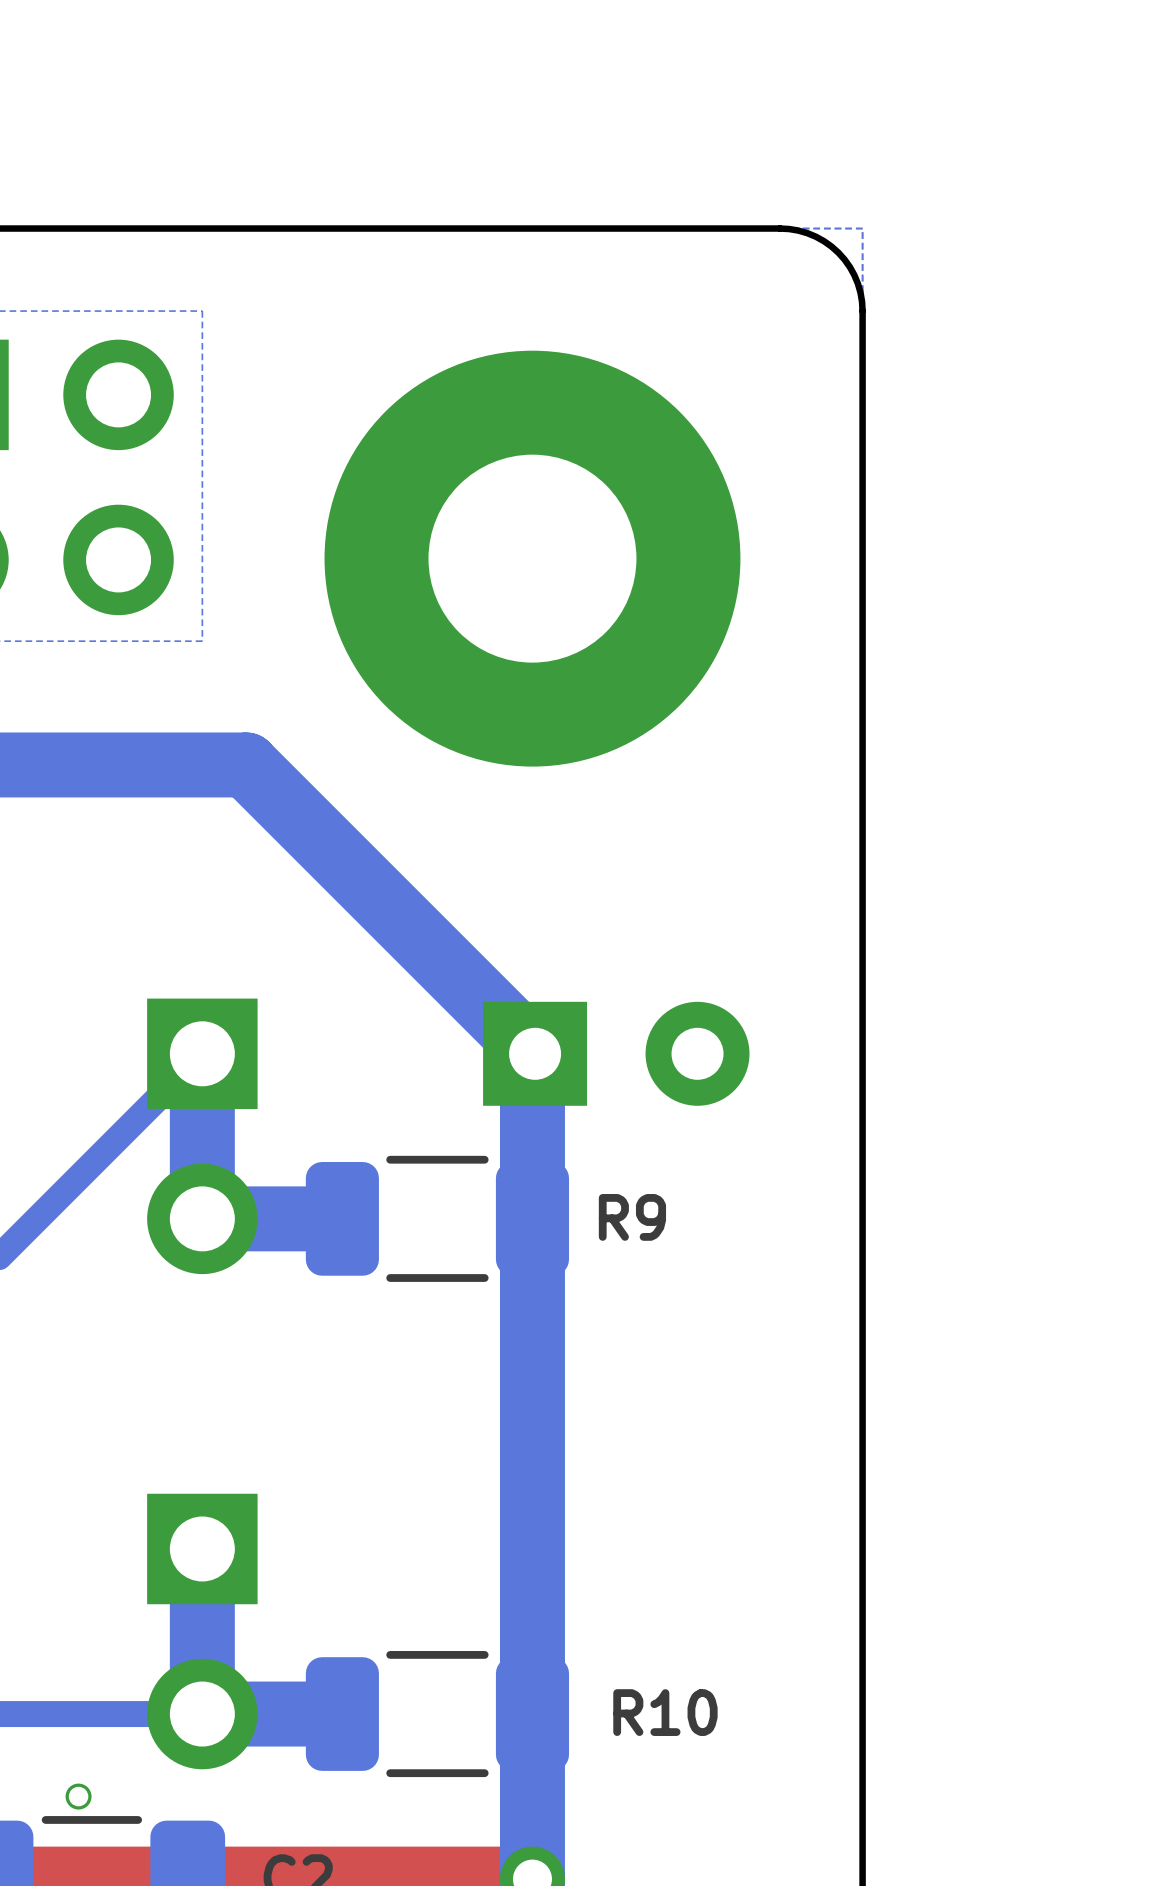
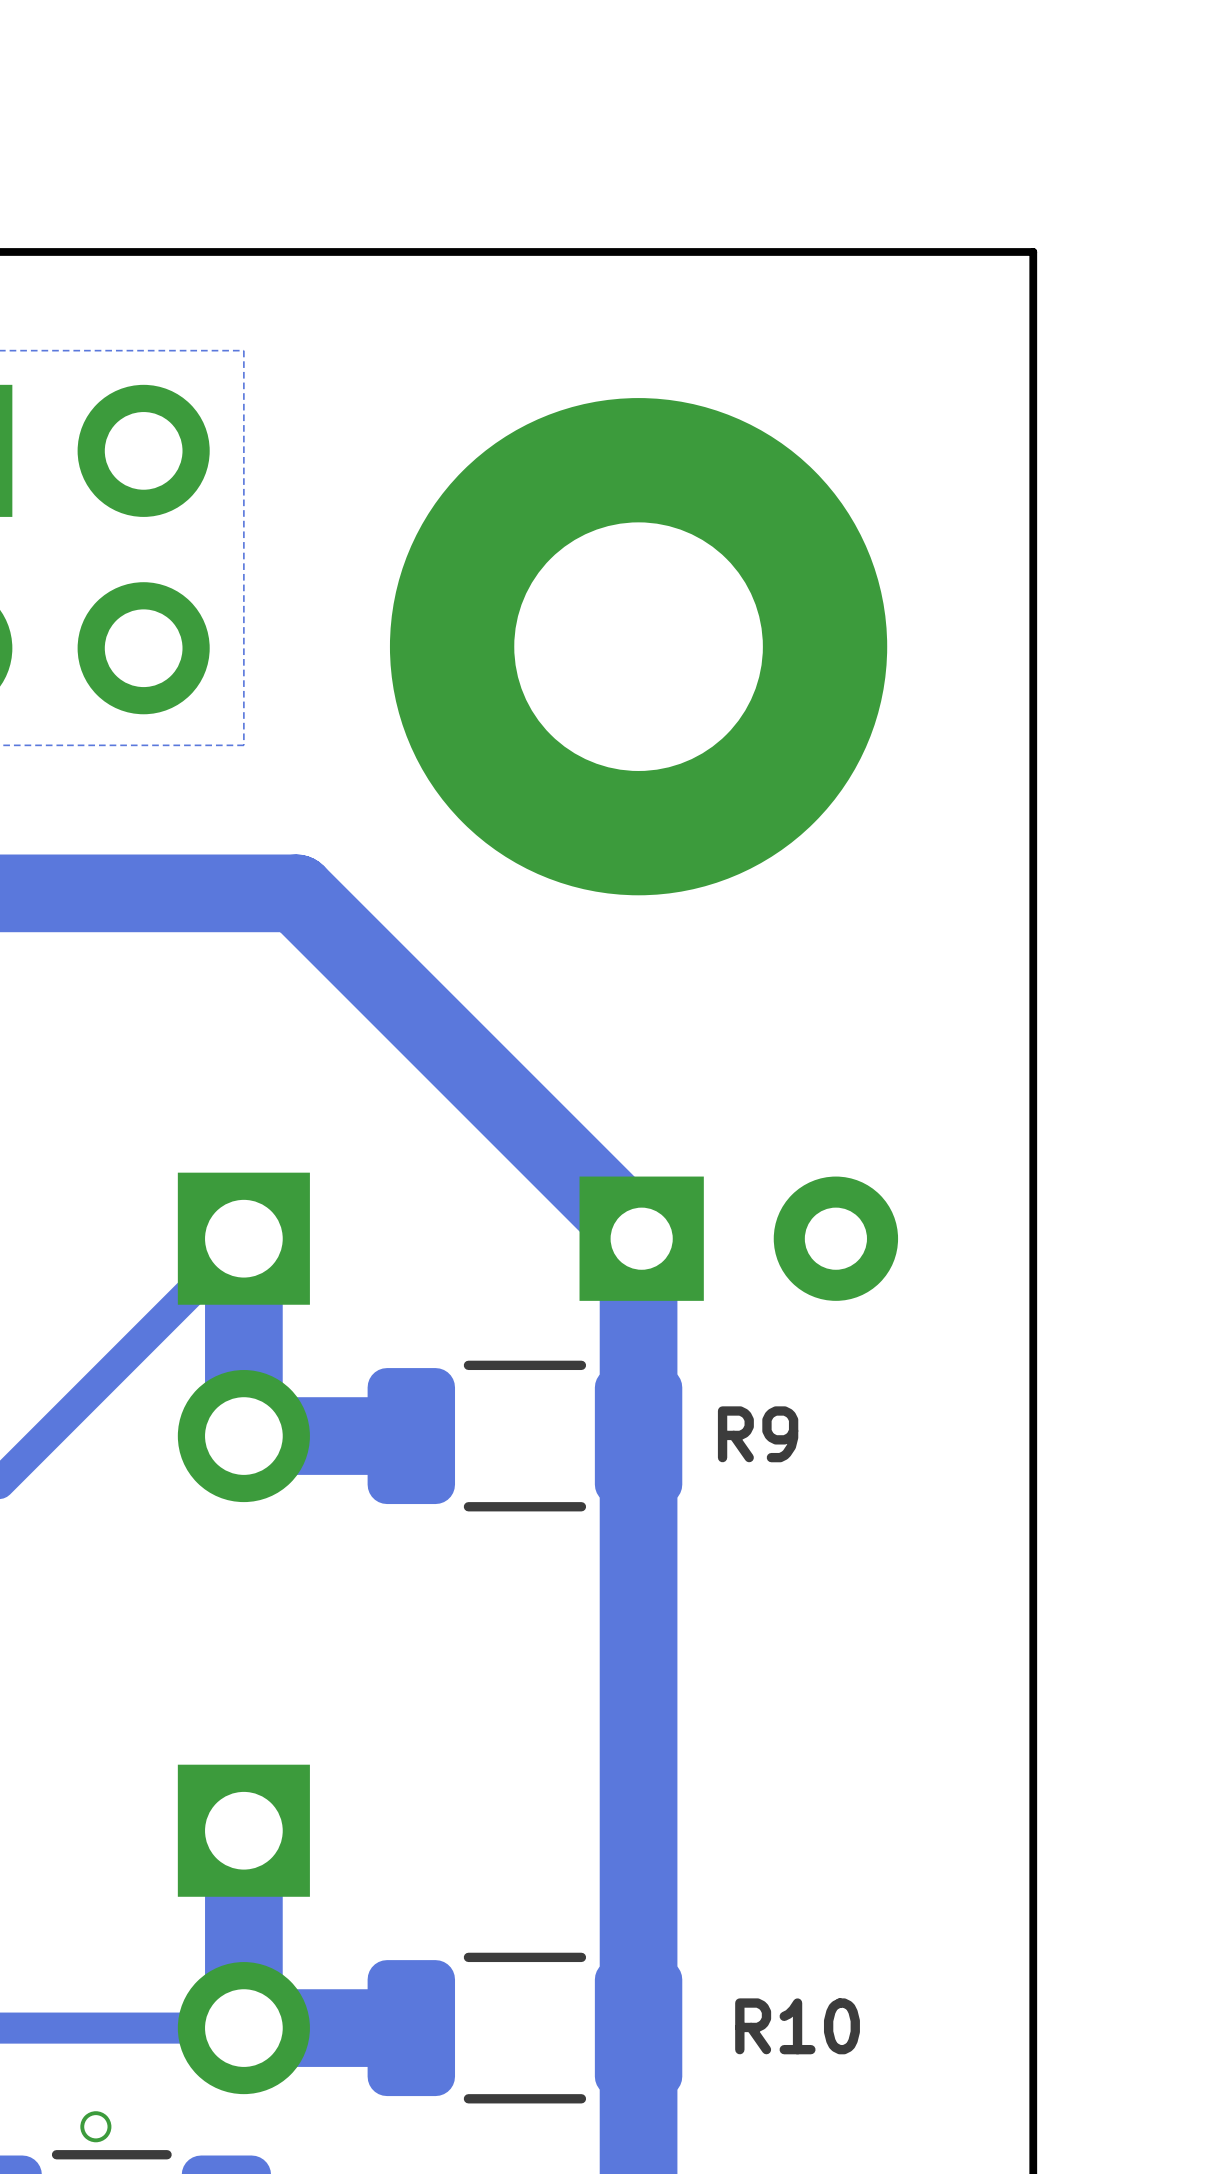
board edge: (780, 228) (807, 233) (823, 241) (838, 252) (854, 275) (860, 292) (862, 311) -> (934, 251) (1033, 251) (1033, 350)

